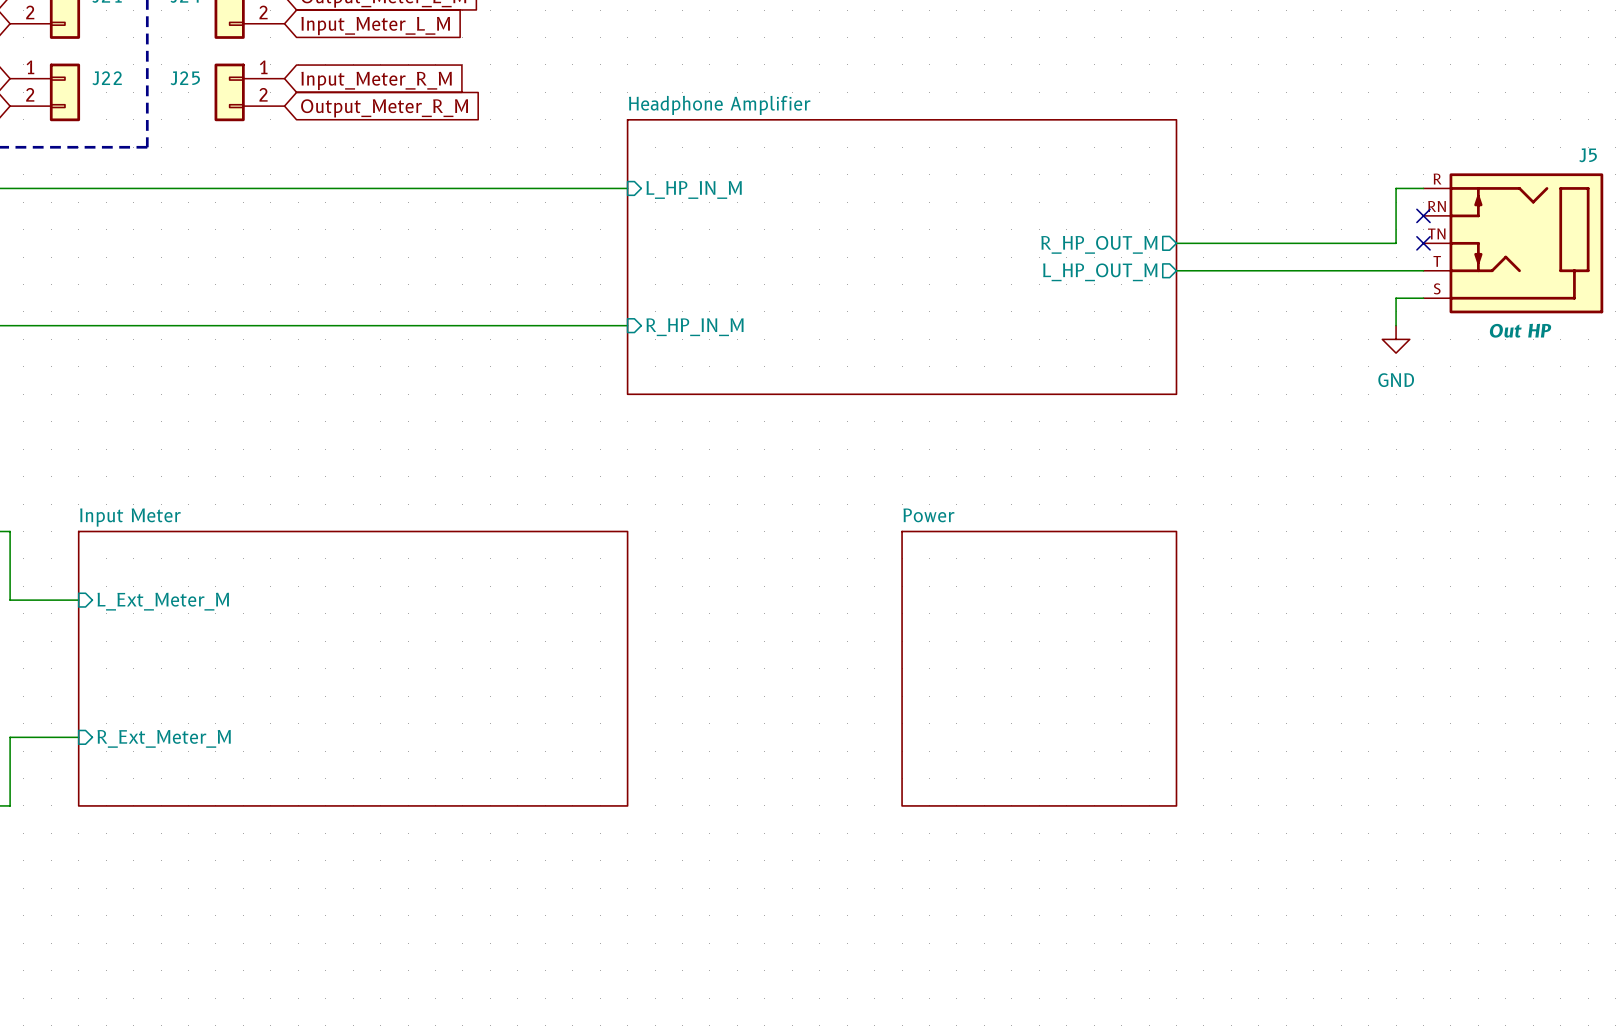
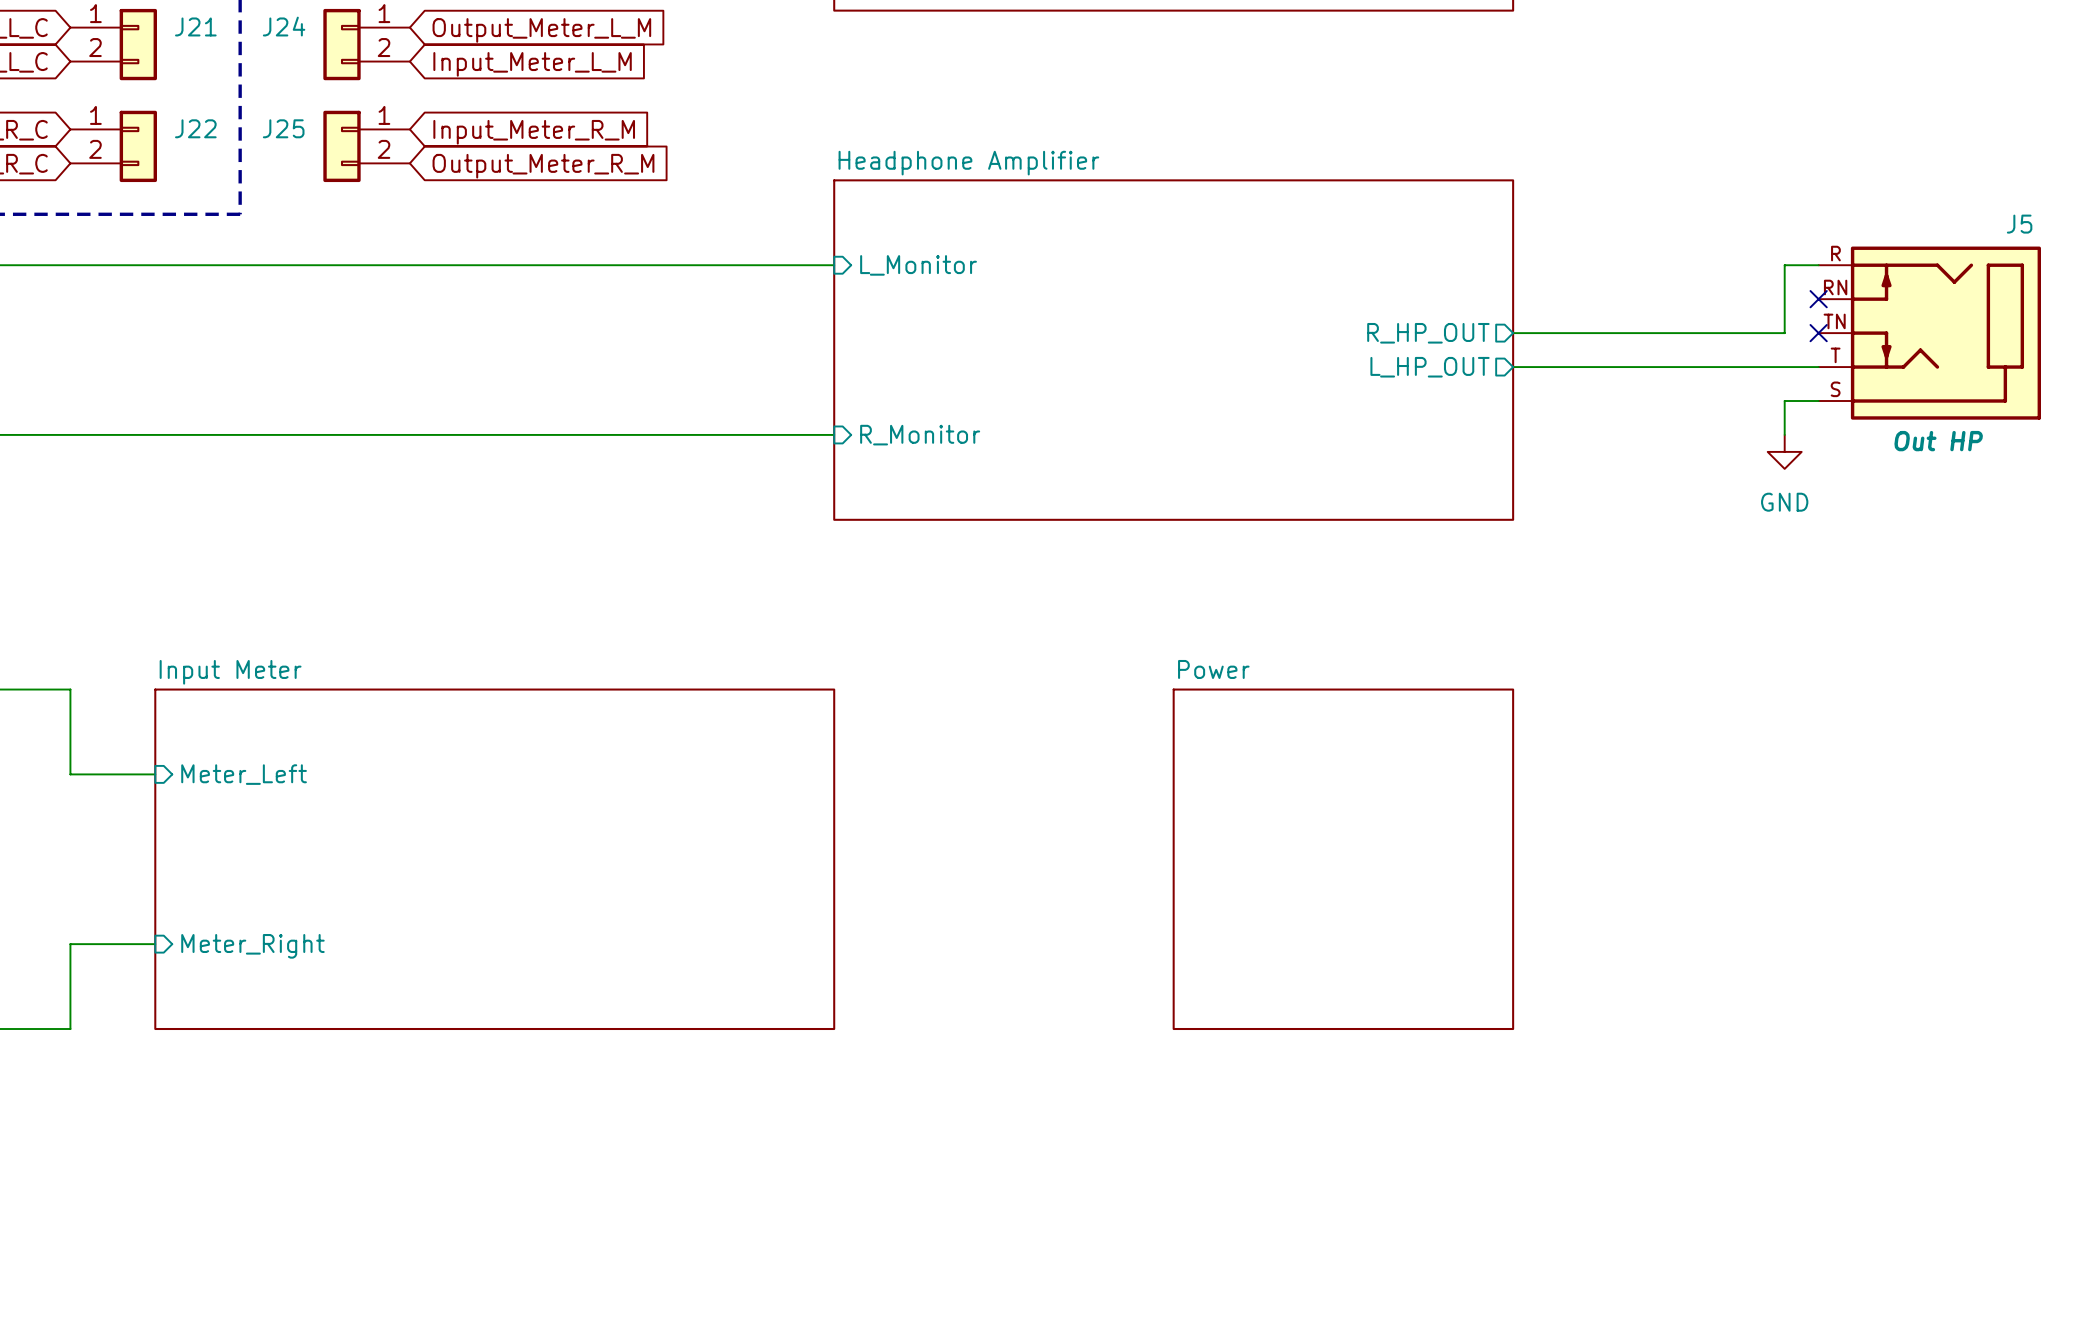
sheet pin: L_HP_IN_M (694, 189) -> L_Monitor (918, 265)
sheet pin: R_HP_OUT_M (1099, 244) -> R_HP_OUT (1428, 333)
sheet pin: L_HP_OUT_M (1100, 272) -> L_HP_OUT (1430, 367)
sheet pin: R_HP_IN_M (694, 327) -> R_Monitor (920, 435)
sheet pin: L_Ext_Meter_M (163, 601) -> Meter_Left (244, 774)
sheet pin: R_Ext_Meter_M (164, 738) -> Meter_Right (252, 946)

